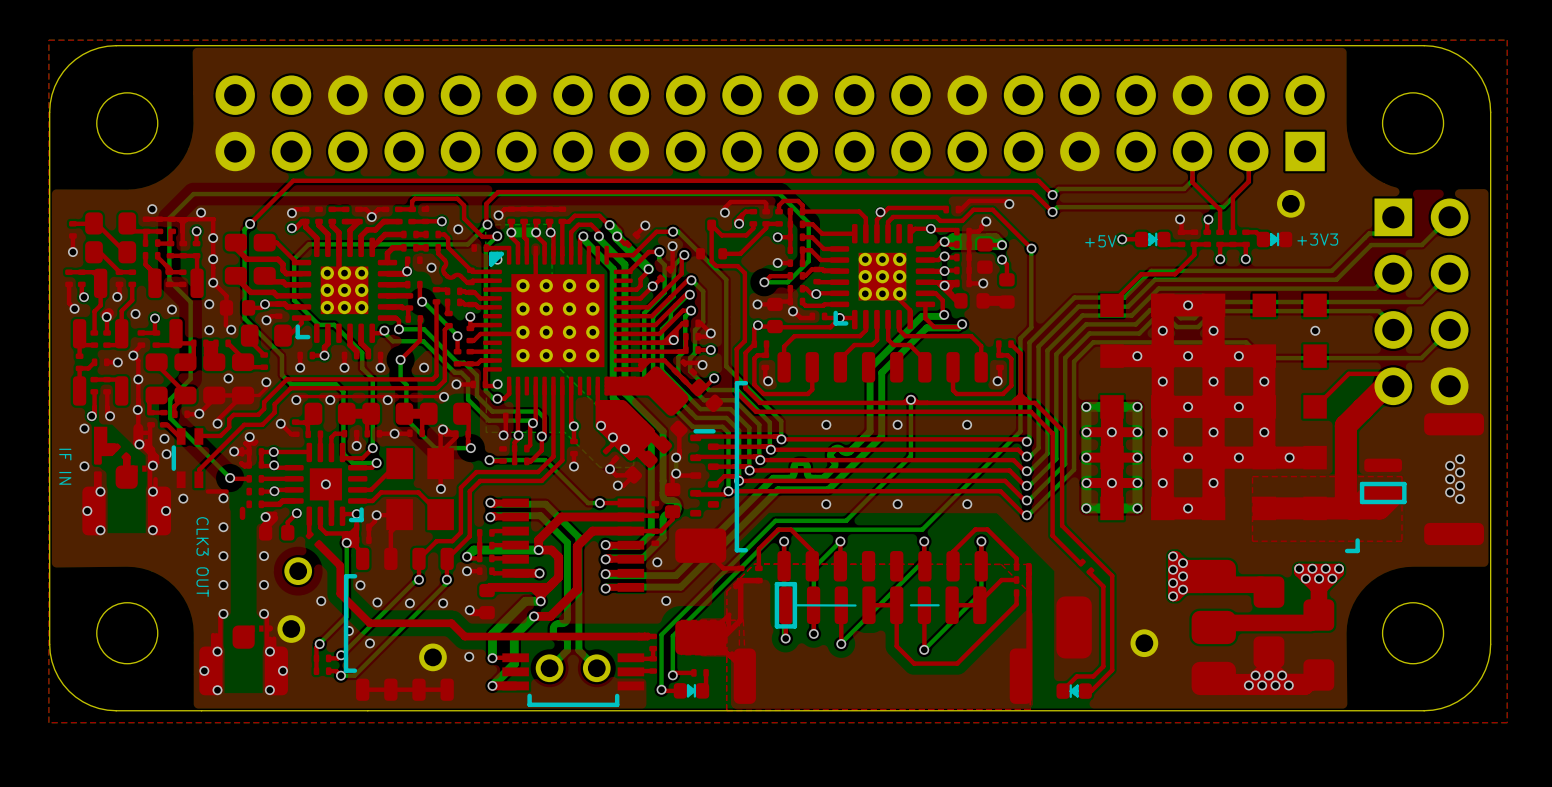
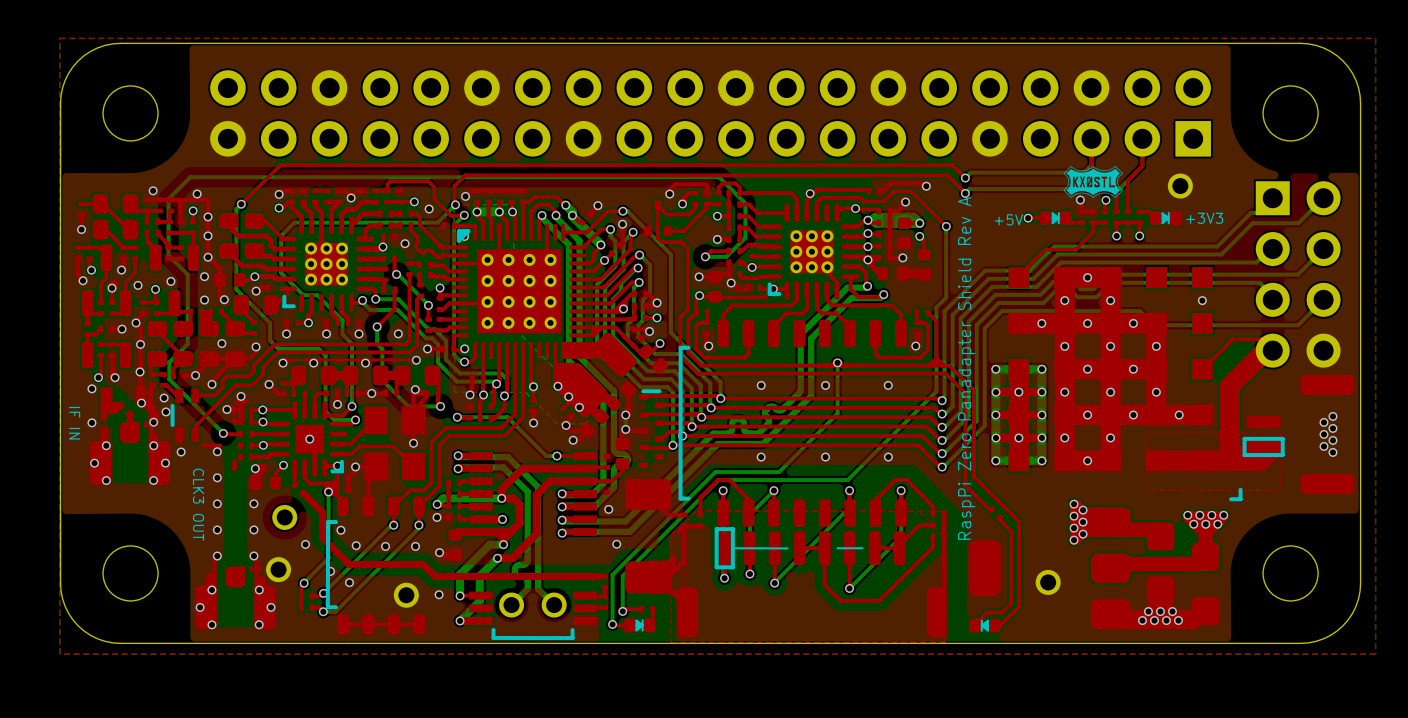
drawing: none -> [1063, 165, 1124, 199]
text: none -> RaspPi Zero Panadapter Shield Rev A (966, 368)

